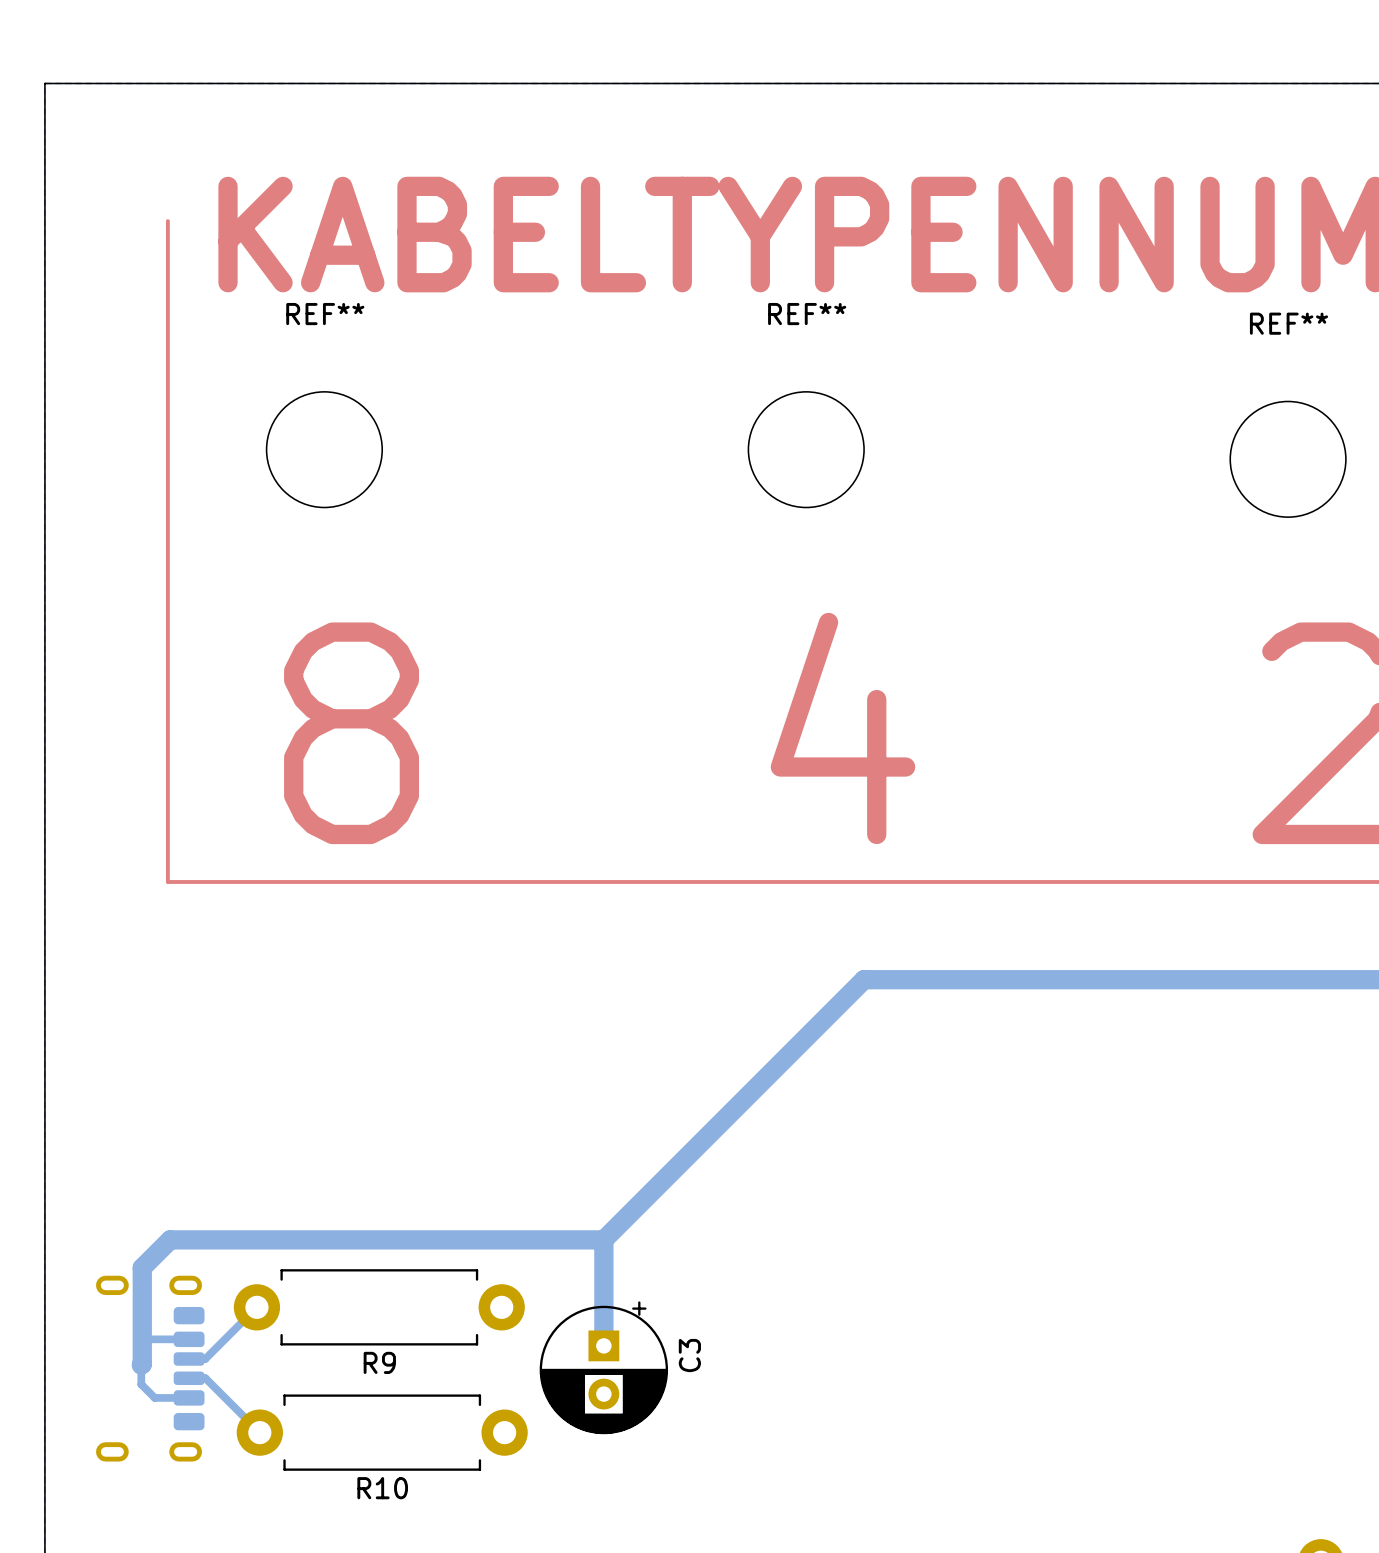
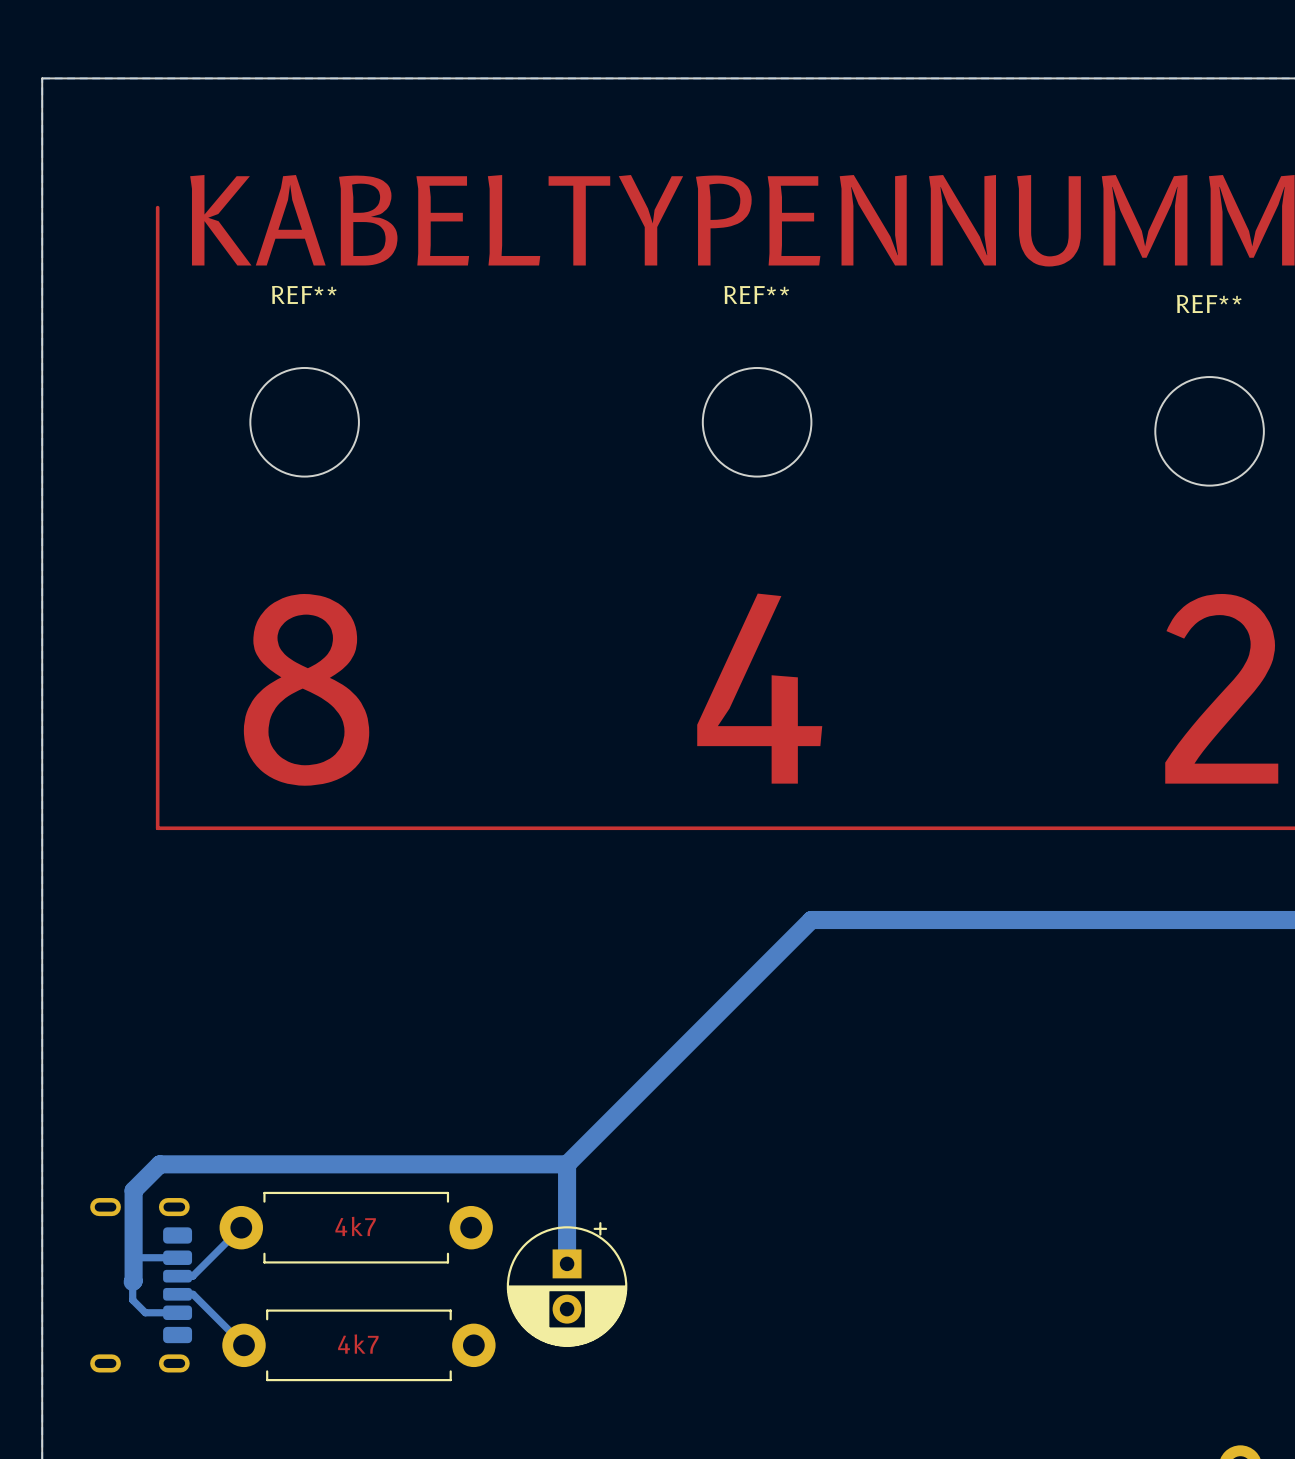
R9 value: none -> 4k7 (355, 1226)
C3 name: C3 (689, 1355) -> none
R9 name: R9 (379, 1362) -> none
R10 value: none -> 4k7 (358, 1344)
R10 name: R10 (382, 1488) -> none

